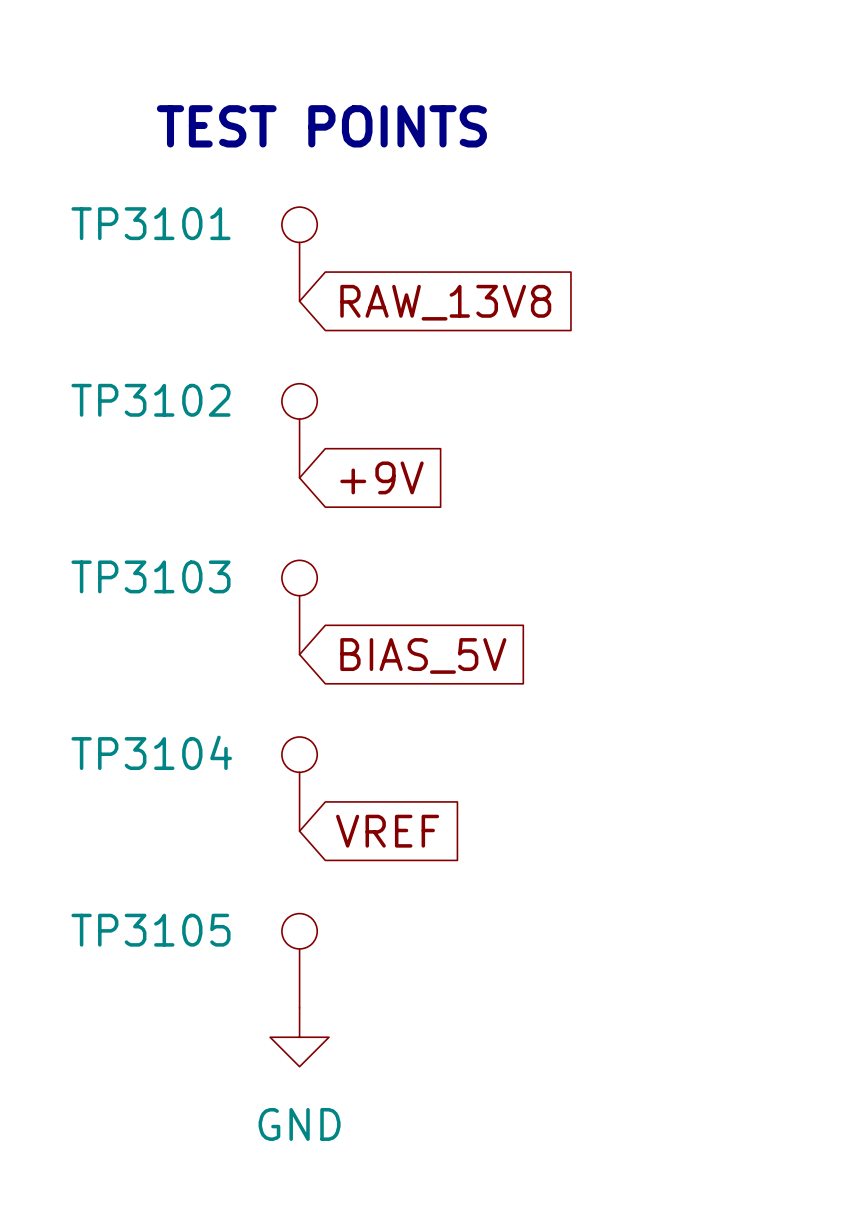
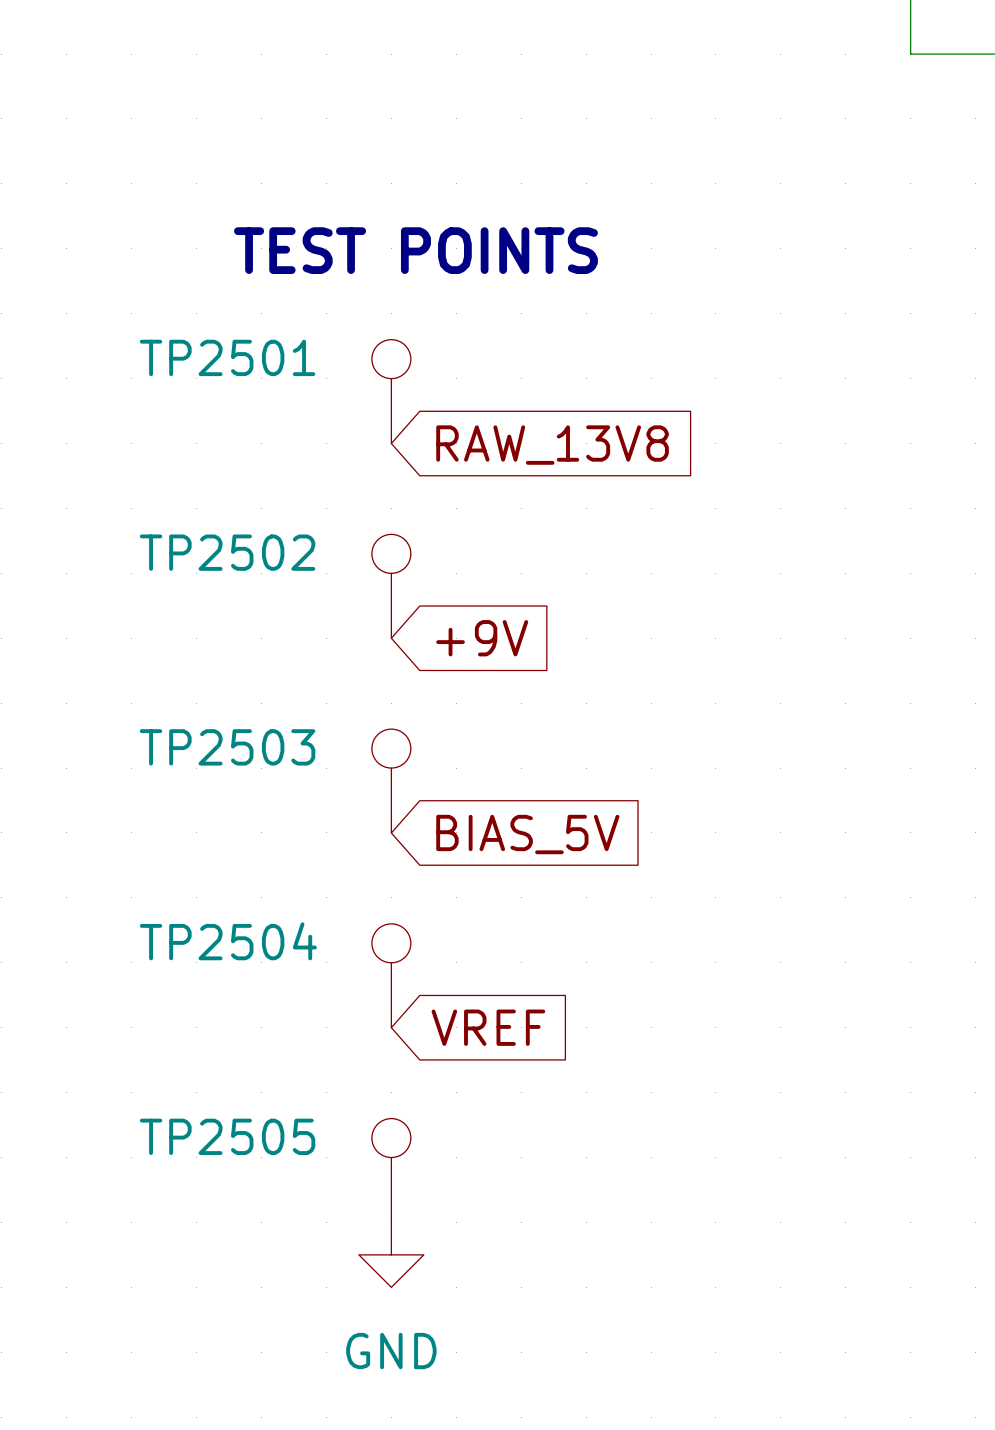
TP3101 name: TP3101 (150, 223) -> TP2501 (227, 357)
TP3102 name: TP3102 (150, 400) -> TP2502 (227, 552)
TP3103 name: TP3103 (150, 576) -> TP2503 (227, 747)
TP3104 name: TP3104 (151, 752) -> TP2504 (228, 941)
TP3105 name: TP3105 (150, 930) -> TP2505 (227, 1136)

